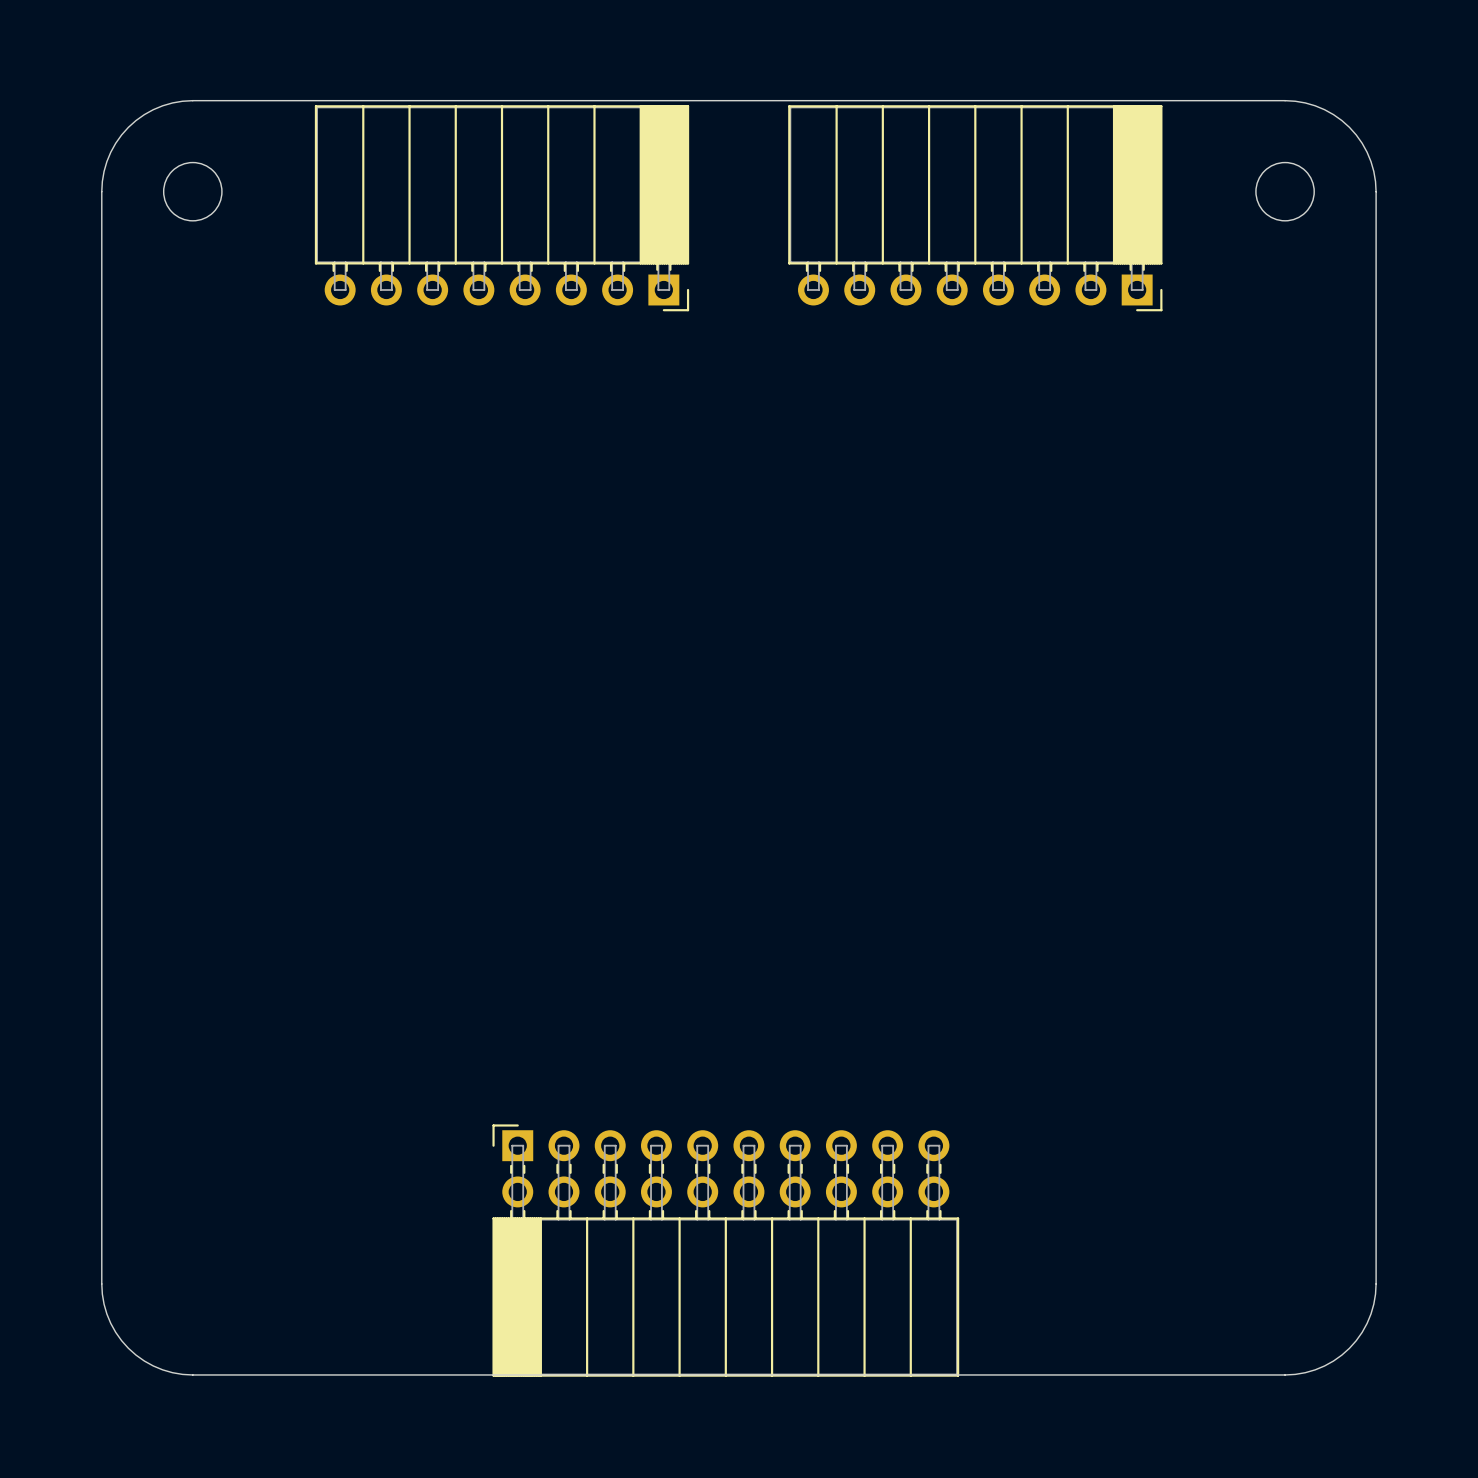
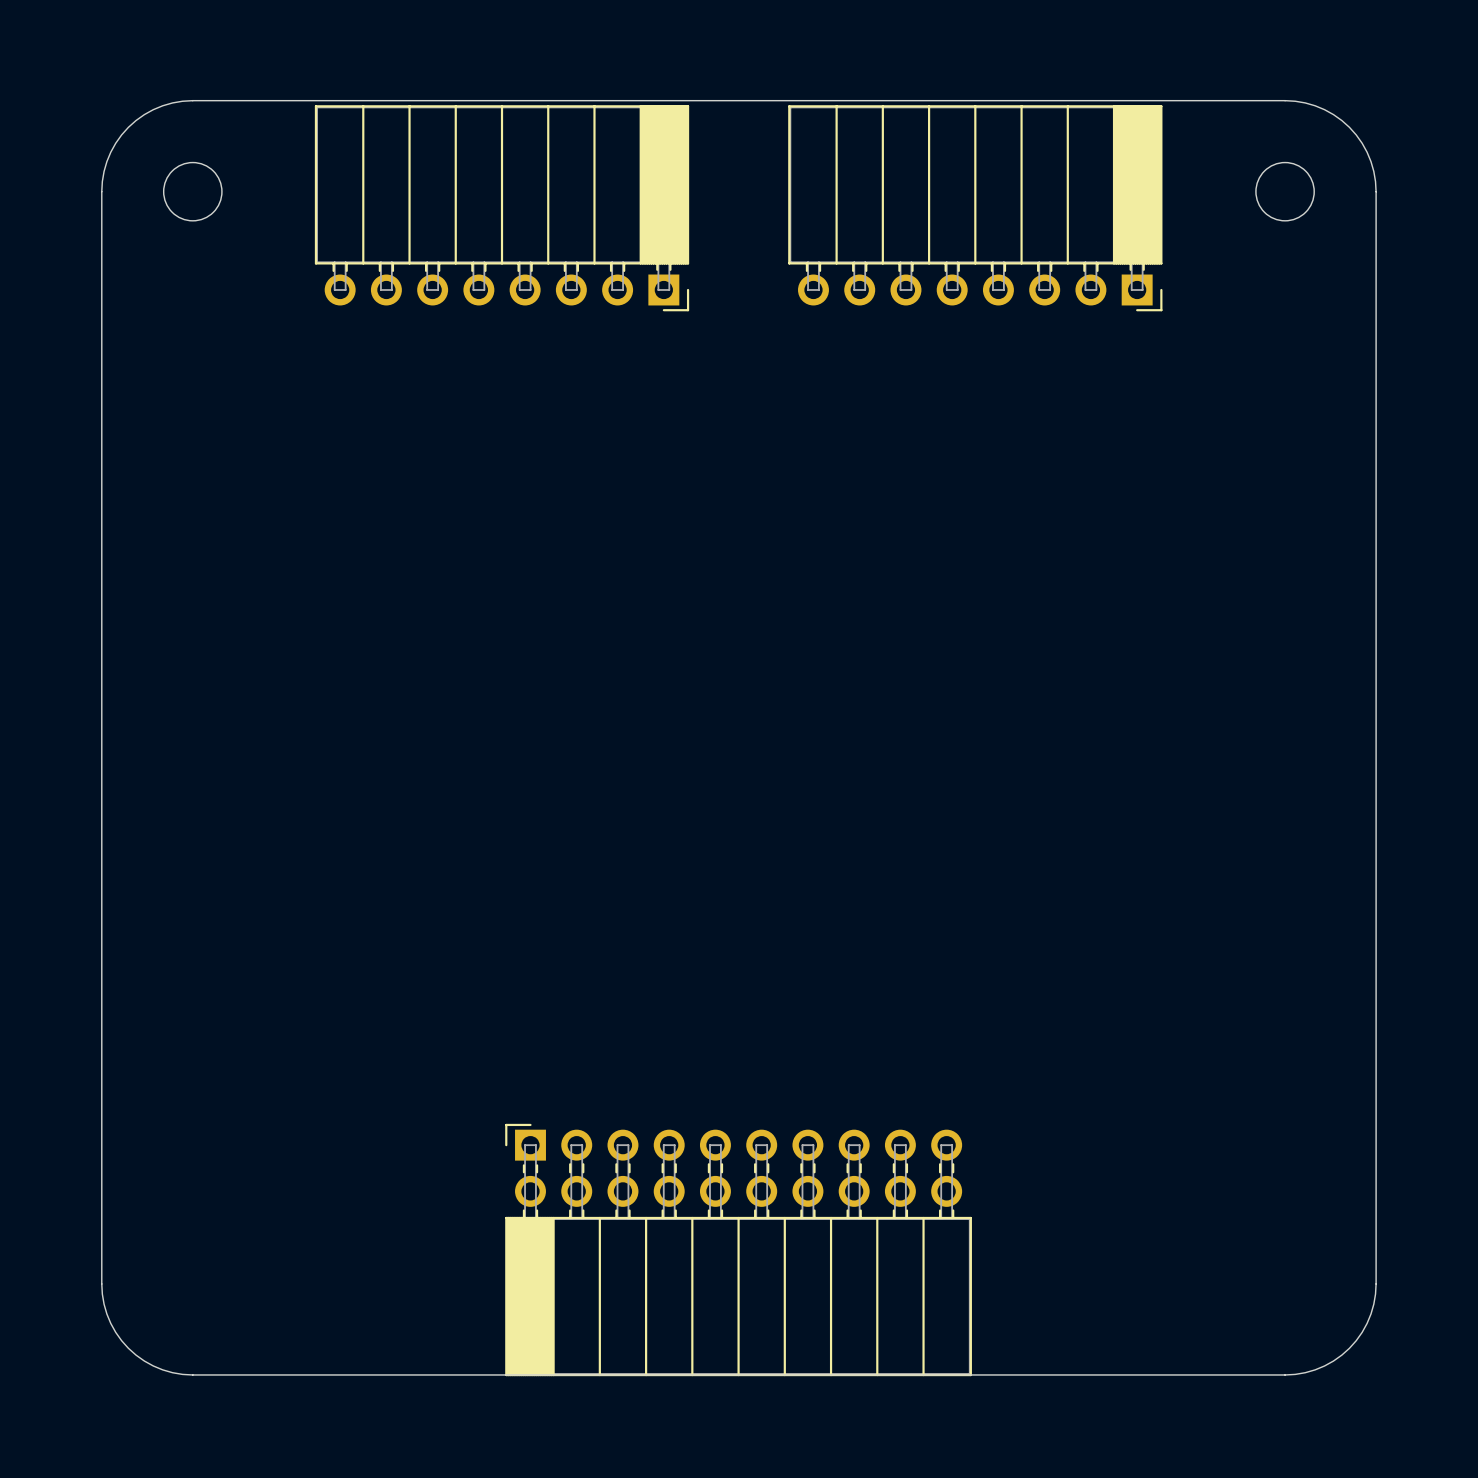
part position: (725, 1250) -> (738, 1250)

